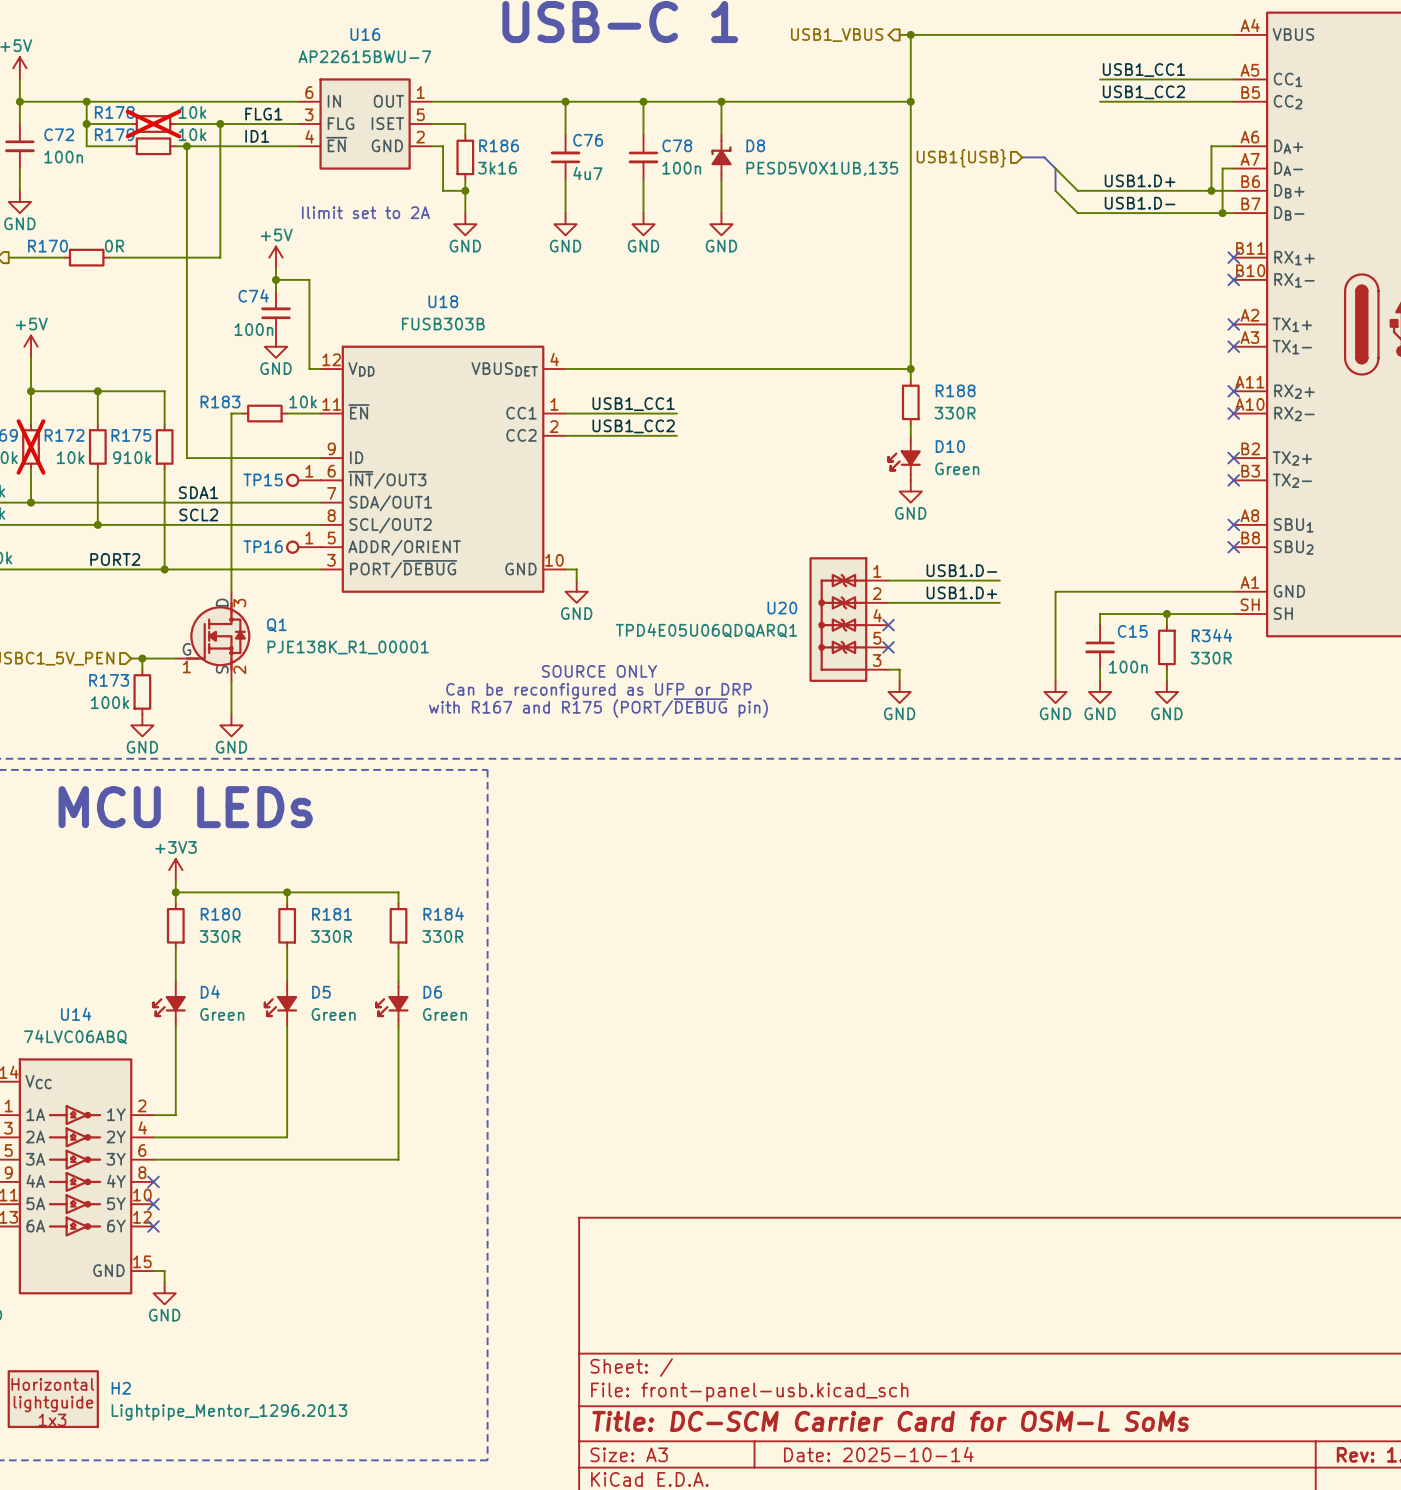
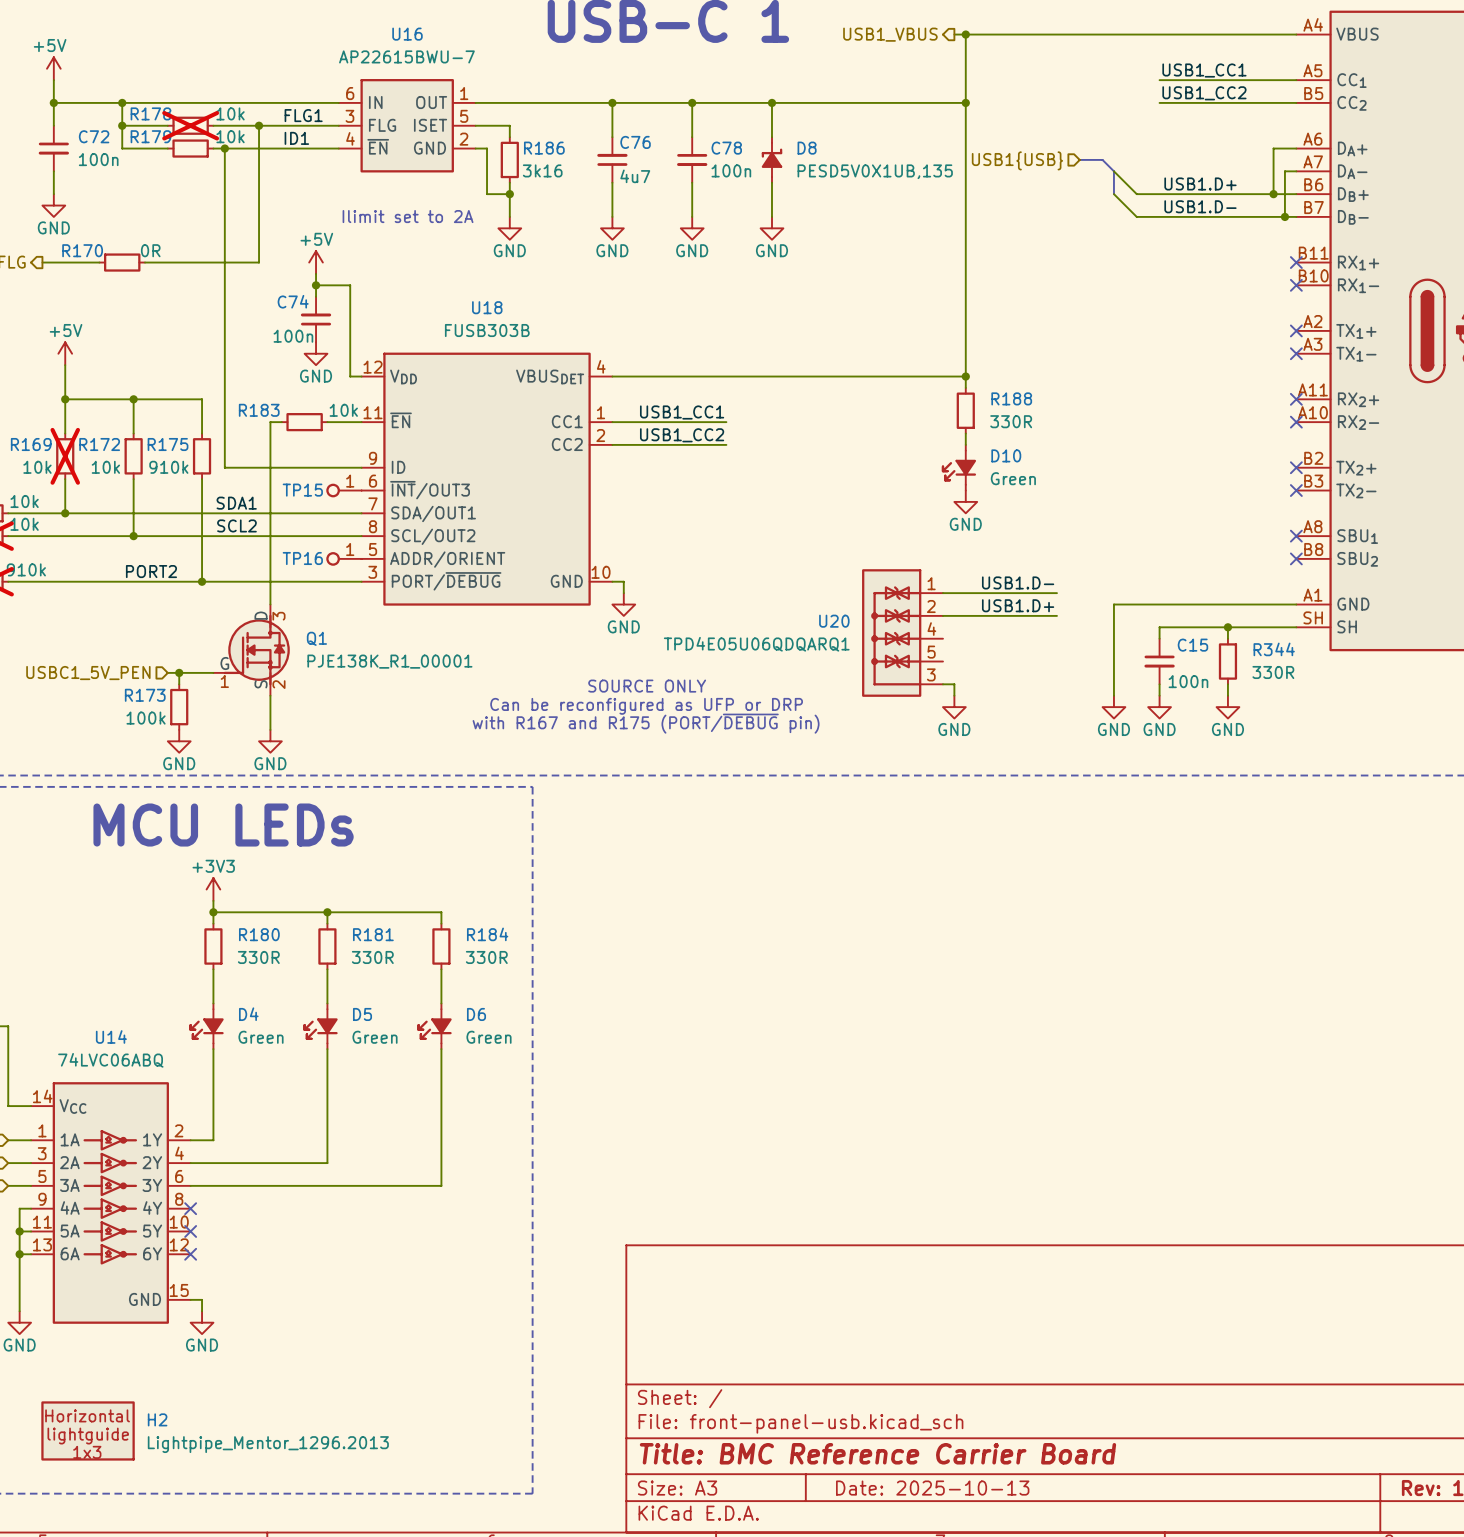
no-connect mark: (888, 625) -> none
no-connect mark: (888, 647) -> none
title block: Title: DC-SCM Carrier Card for OSM-L SoMs (890, 1421) -> Title: BMC Reference Carrier Board (877, 1453)
title block: Date: 2025-10-14 (878, 1454) -> Date: 2025-10-13 (932, 1488)

